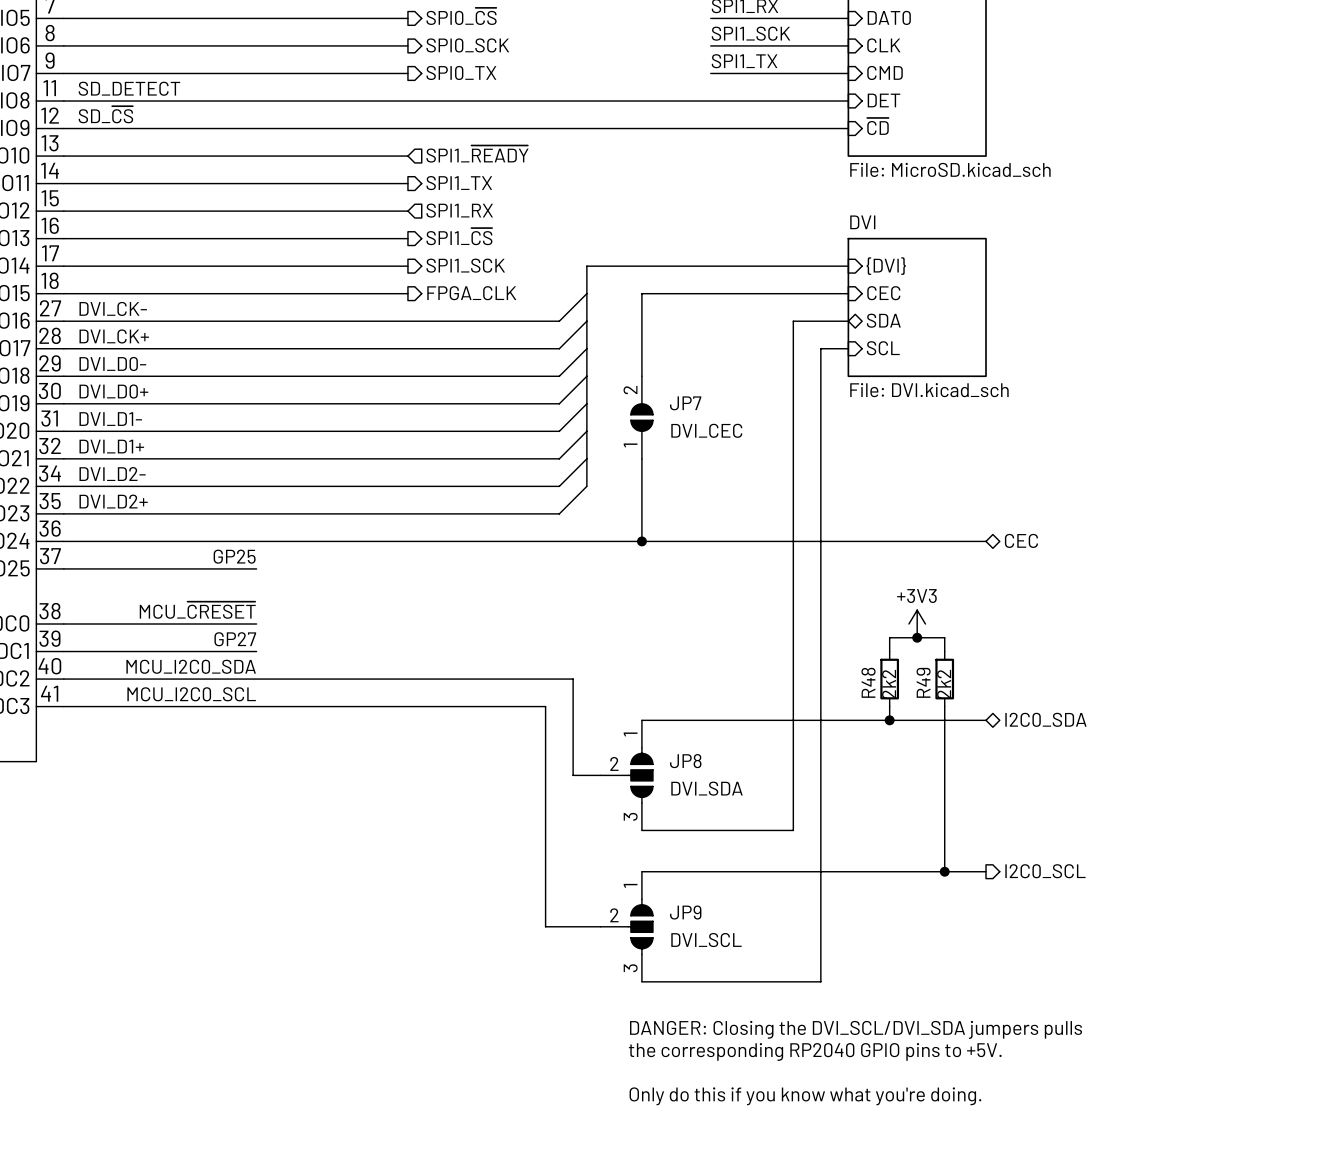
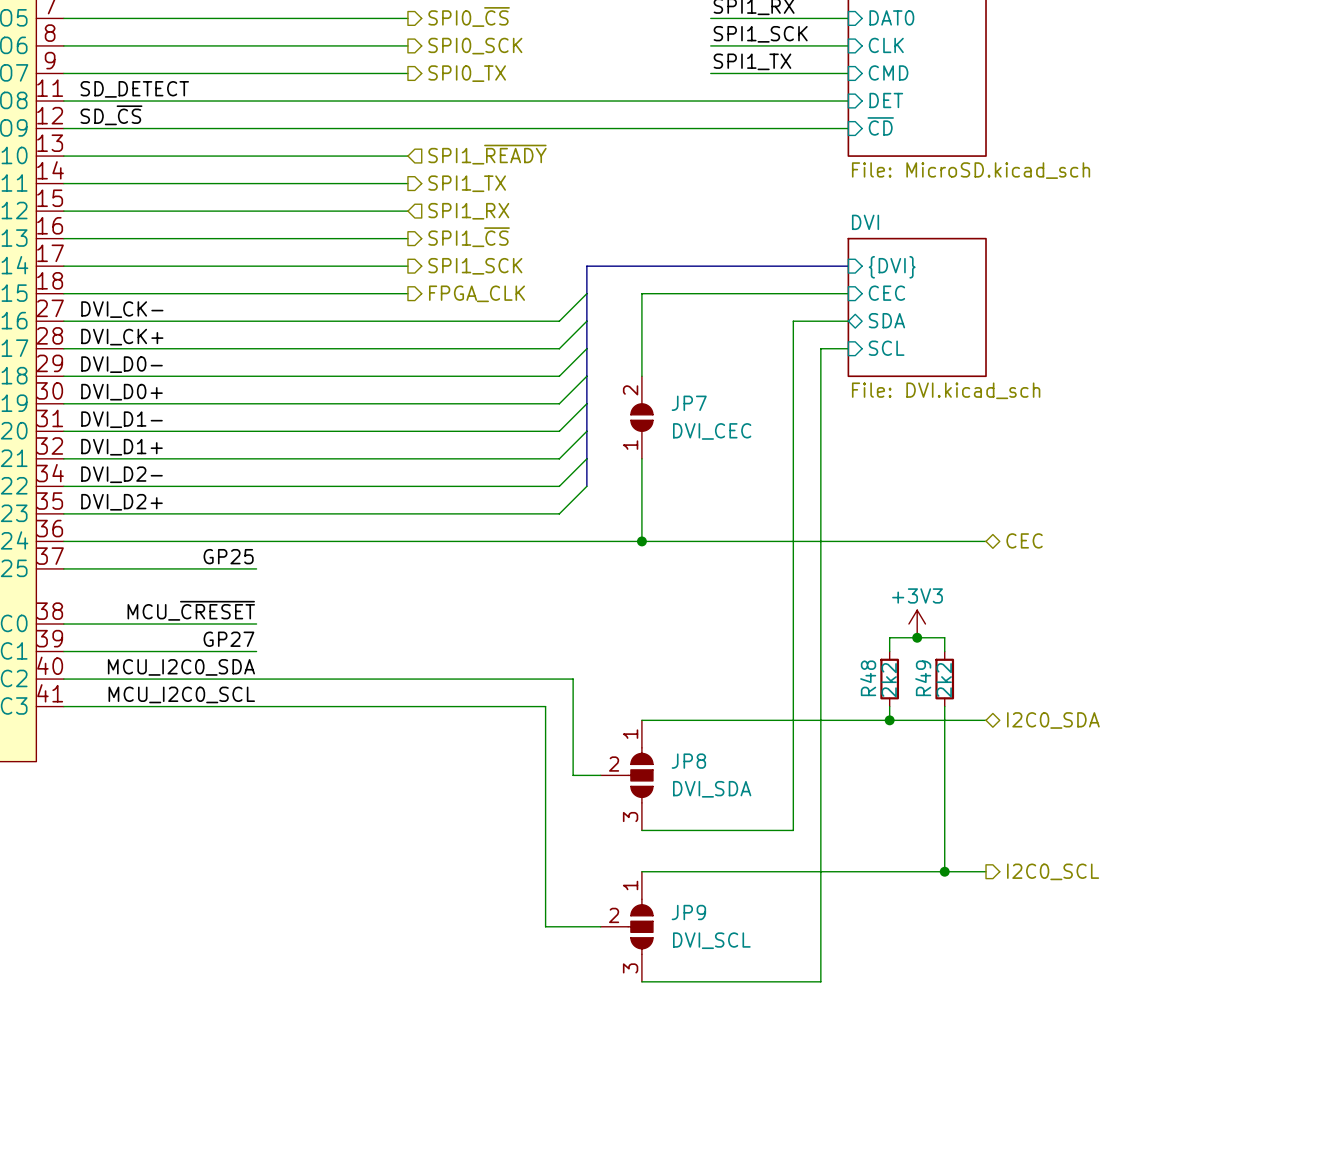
text: DANGER: Closing the DVI_SCL/DVI_SDA jumpers pulls (856, 1029) -> none
text: the corresponding RP2040 GPIO pins to +5V. (815, 1051) -> none
text: Only do this if you know what you're doing. (805, 1096) -> none

